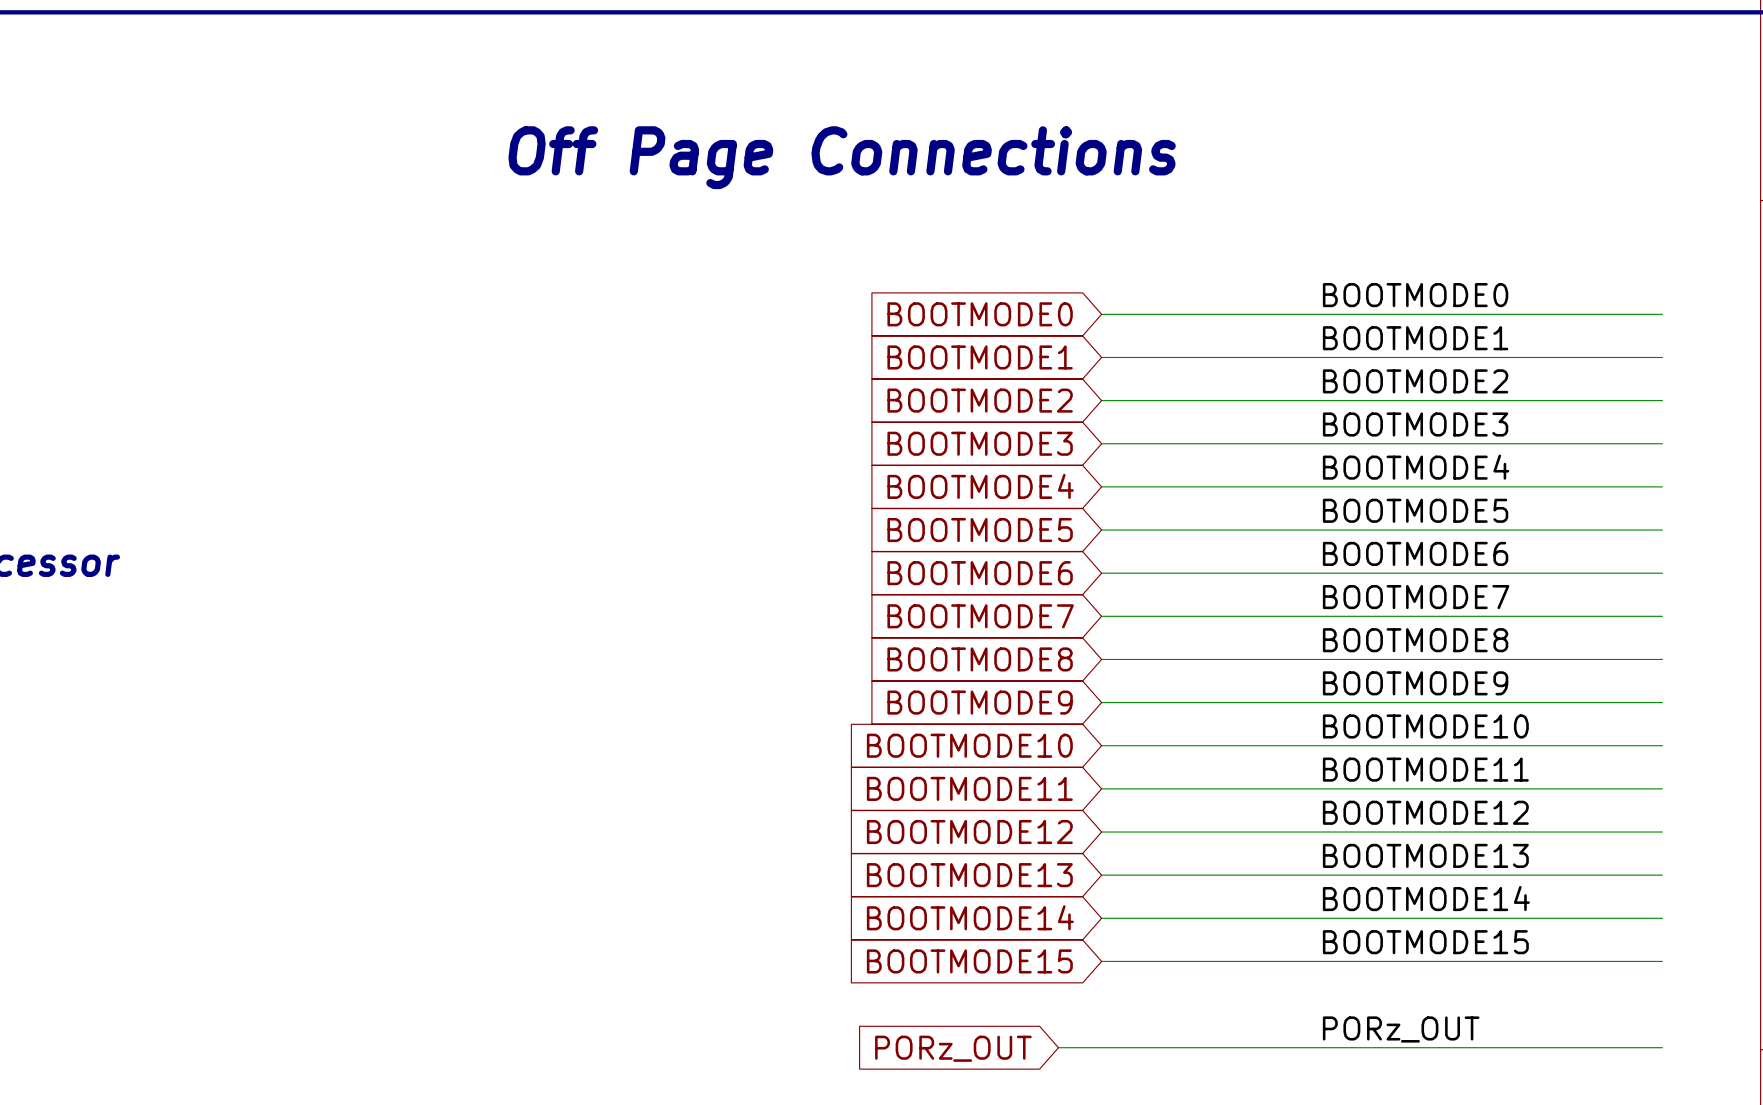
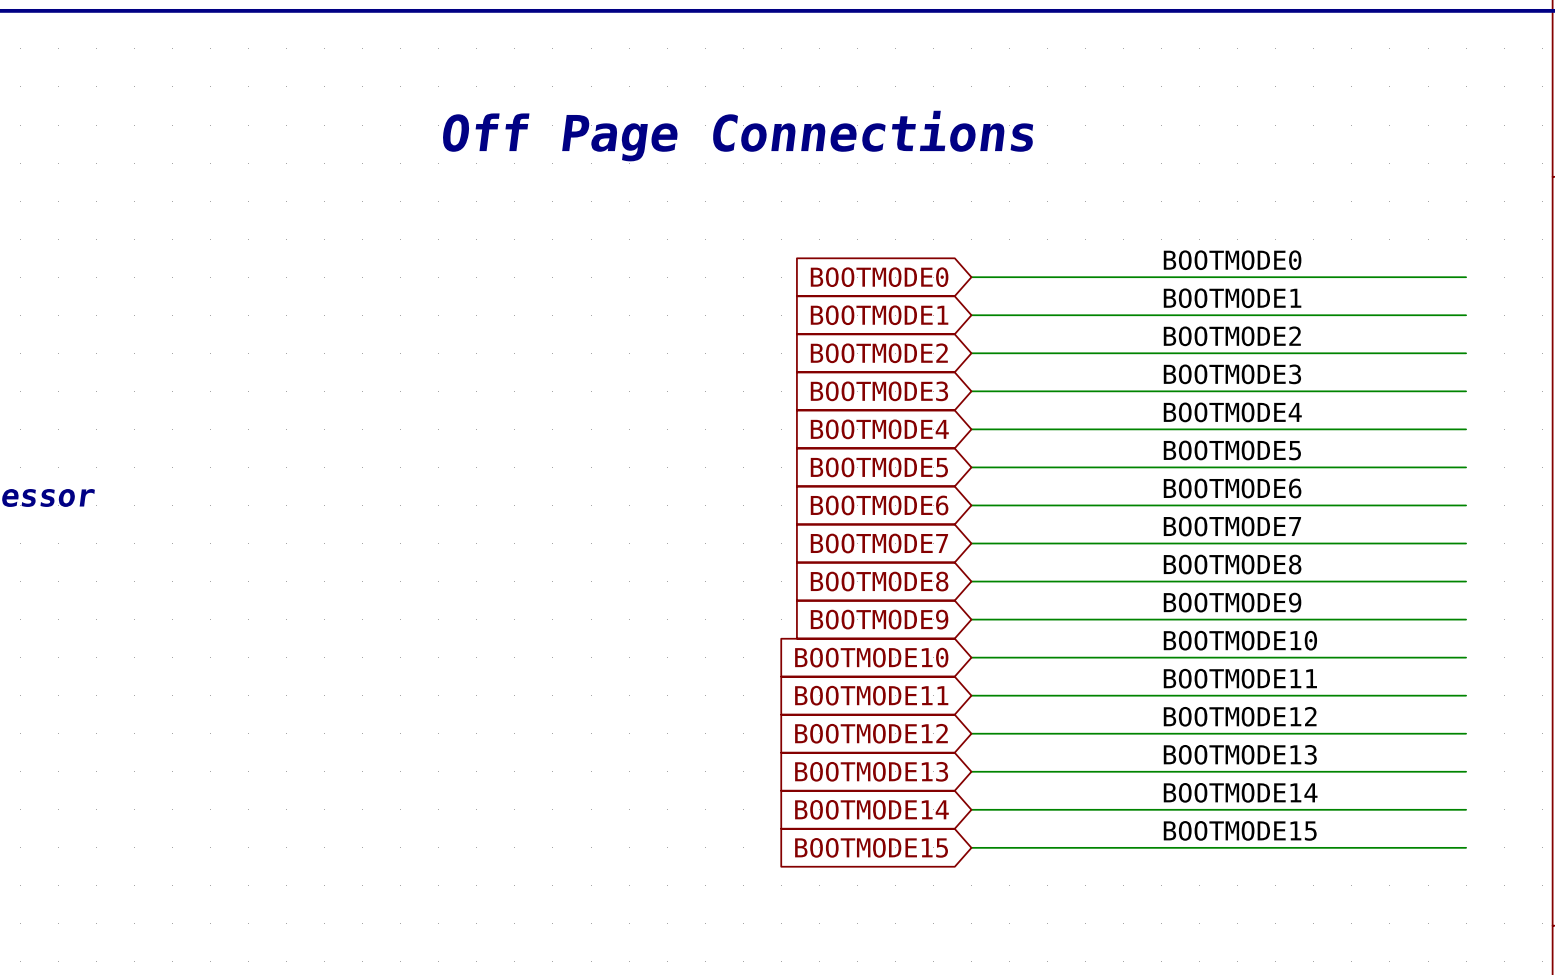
label: PORz_OUT (1401, 1029) -> none
wire: (1058, 1047) (1662, 1047) -> none
global label: PORz_OUT (953, 1048) -> none

